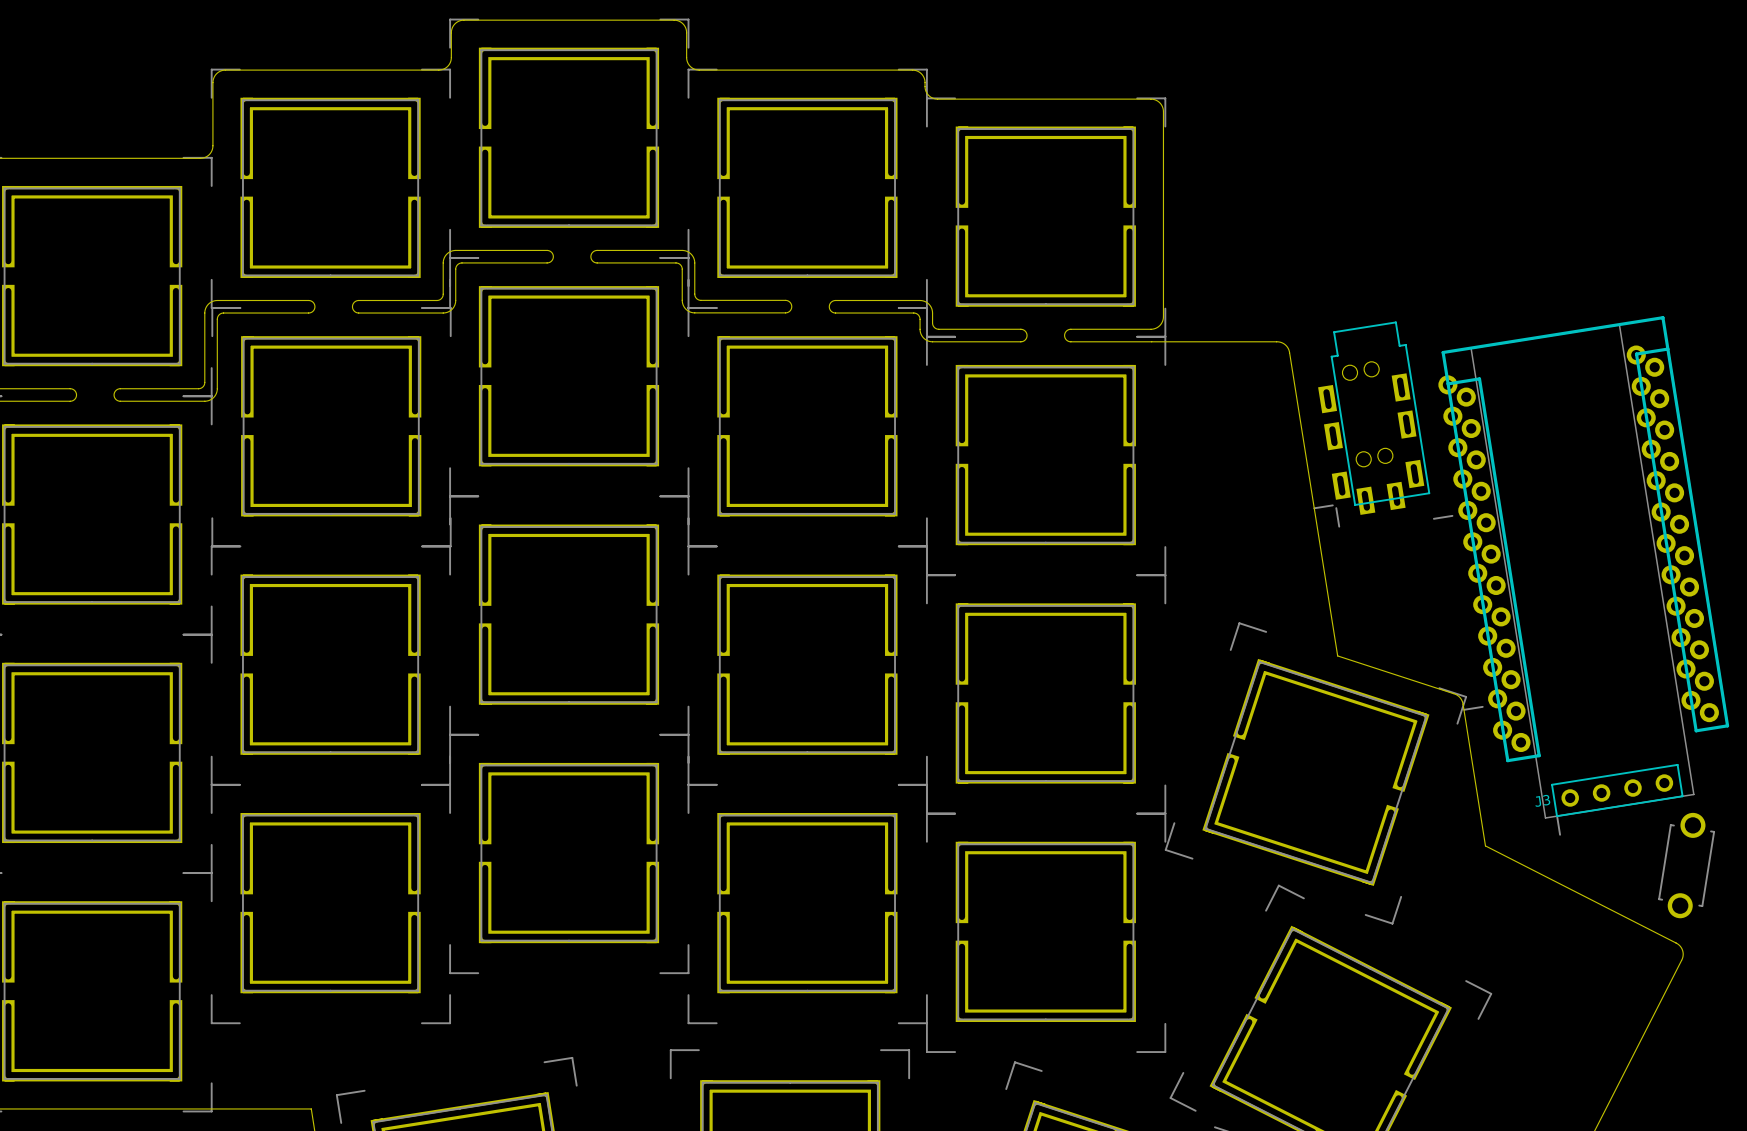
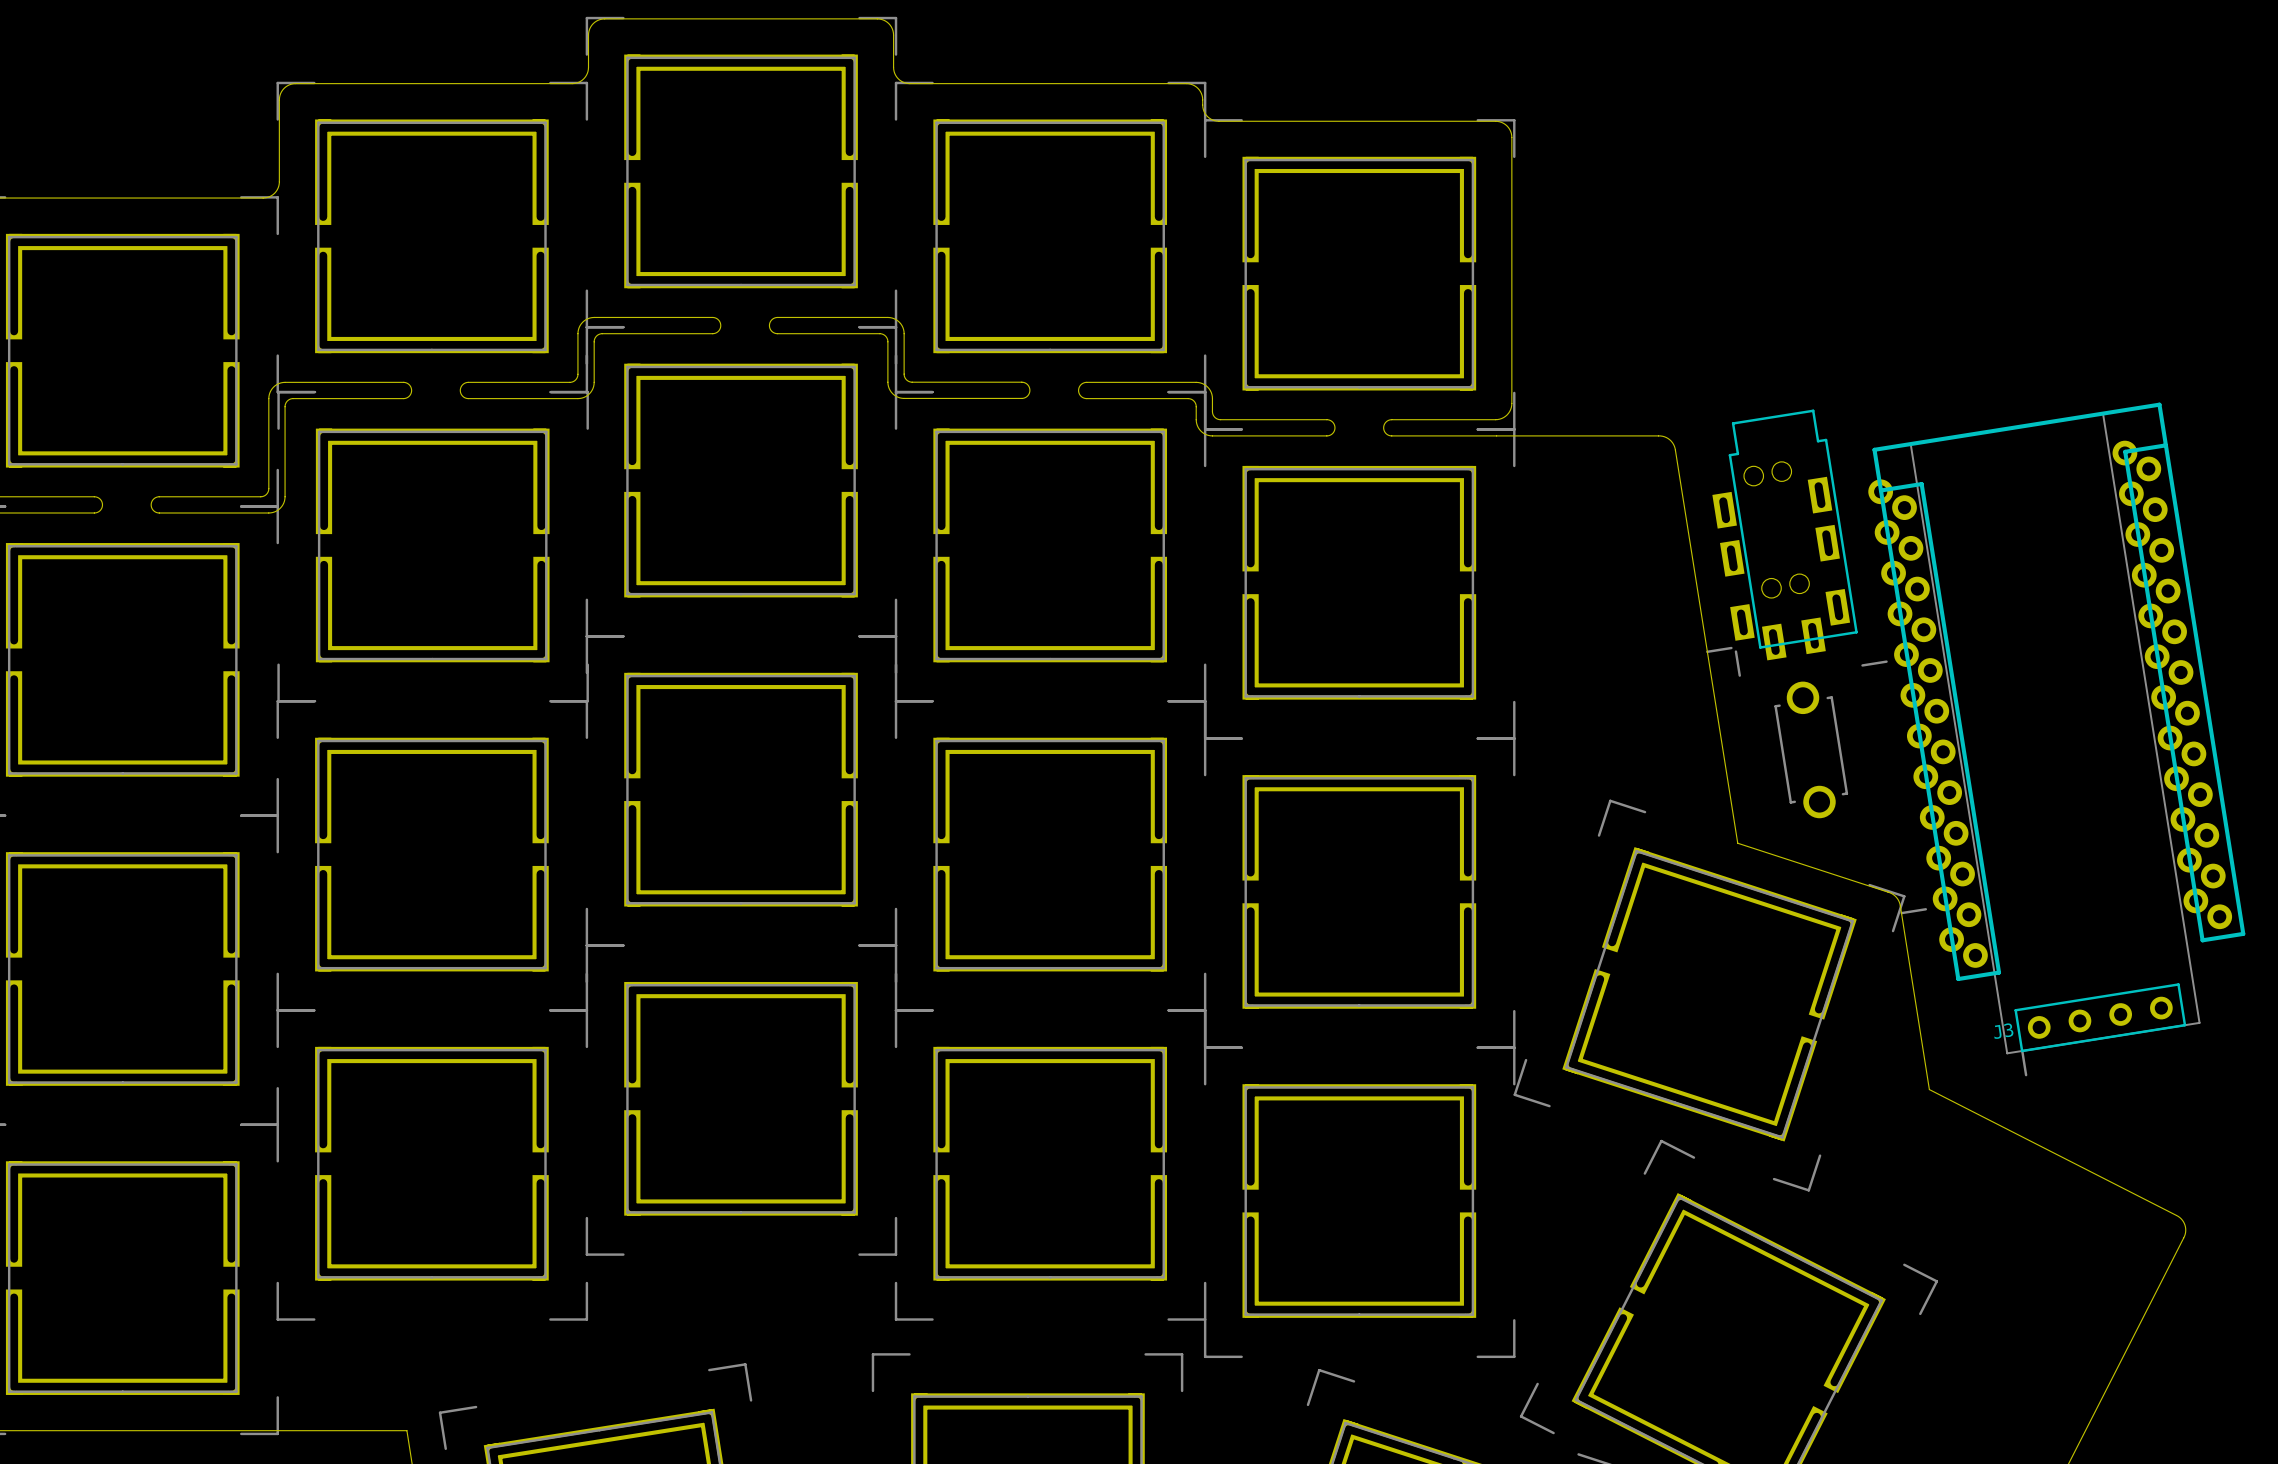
part: none -> (1811, 749)
part: (1686, 865) -> none

